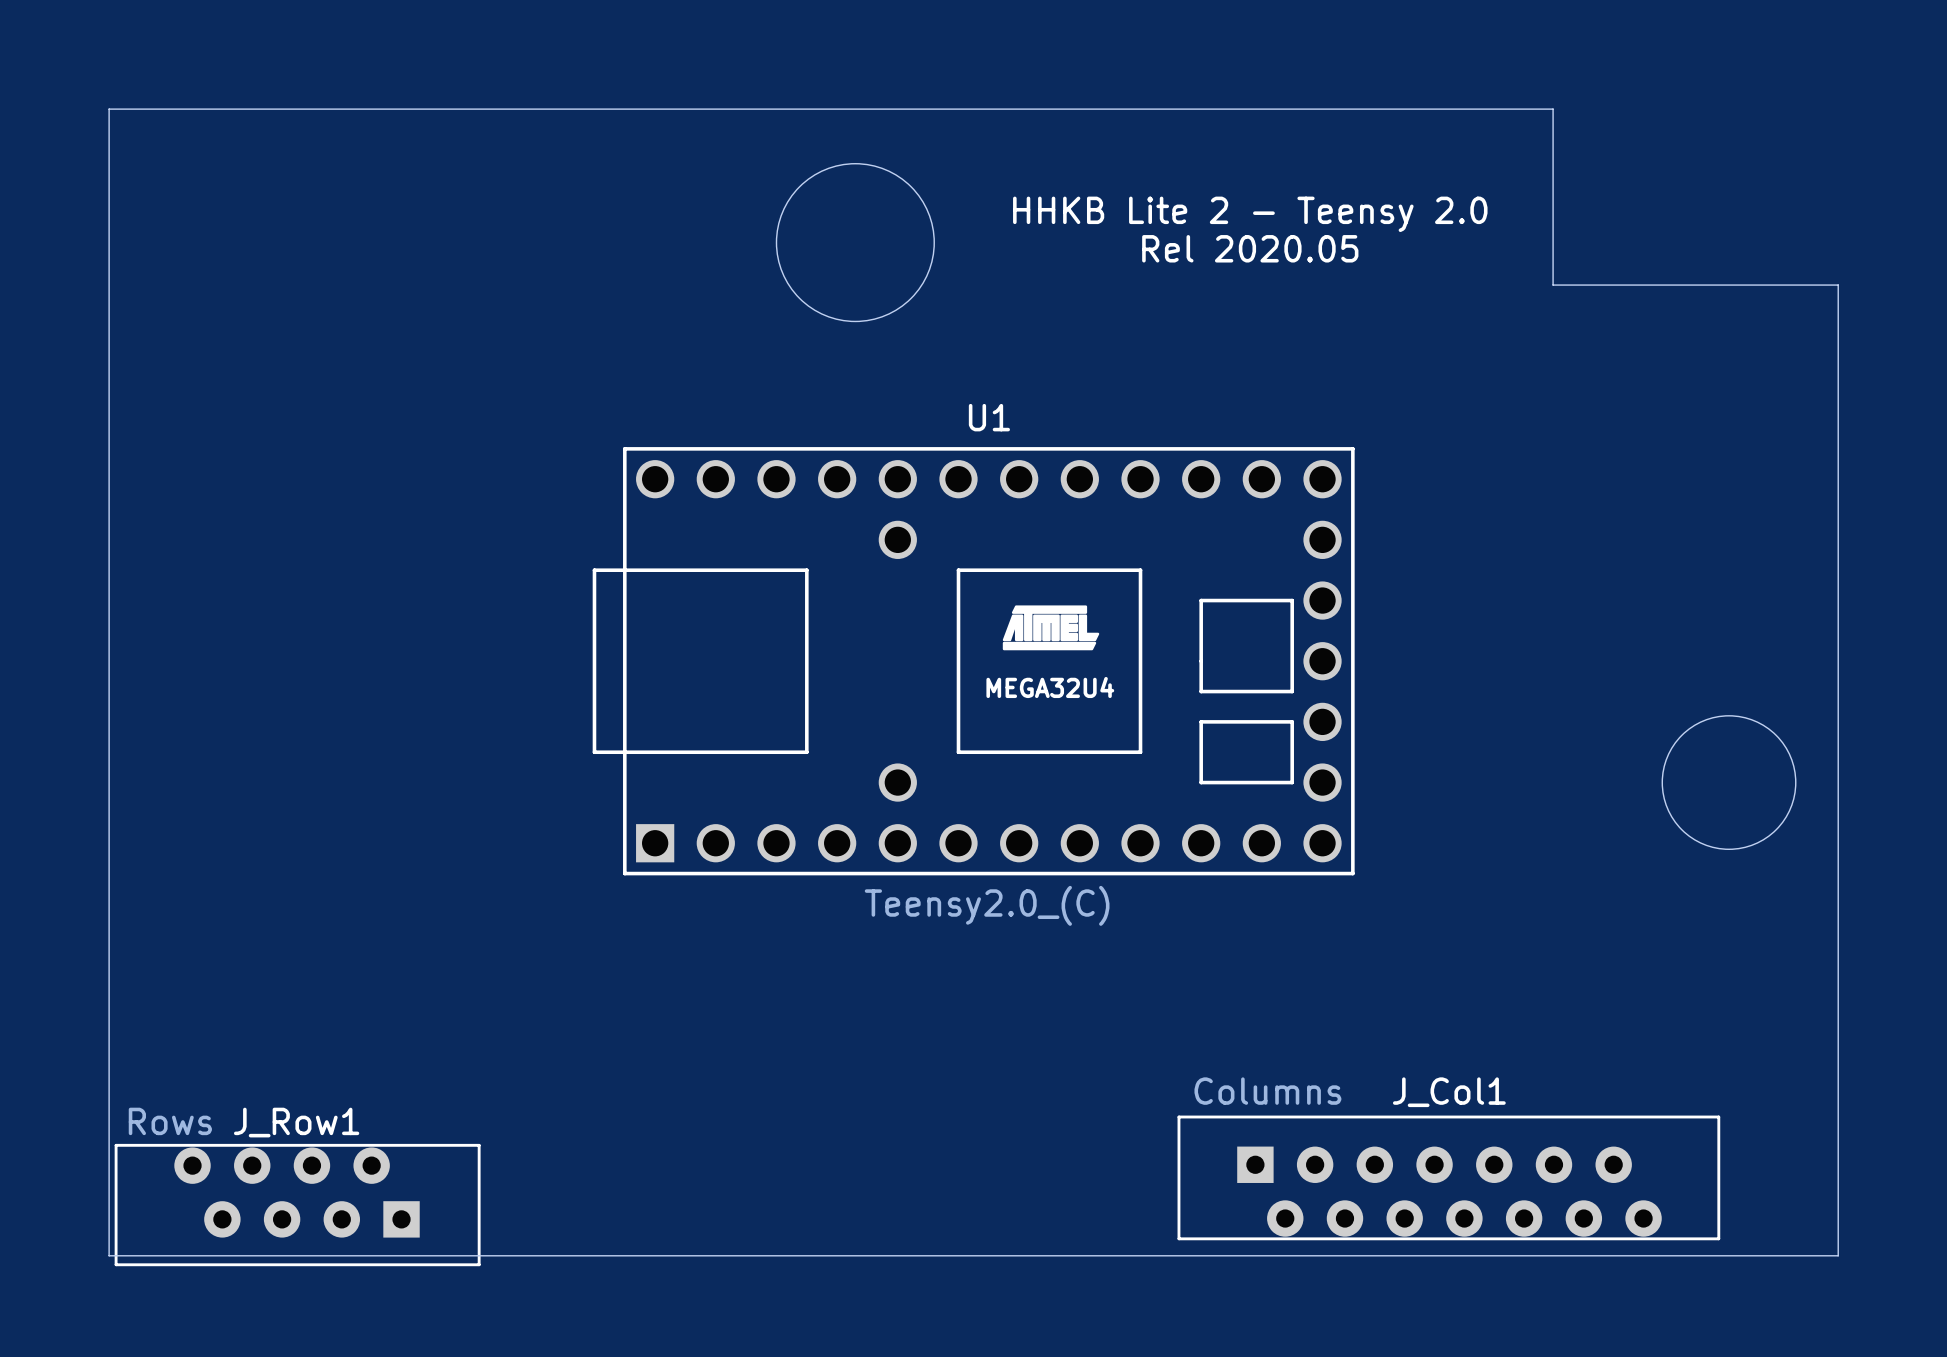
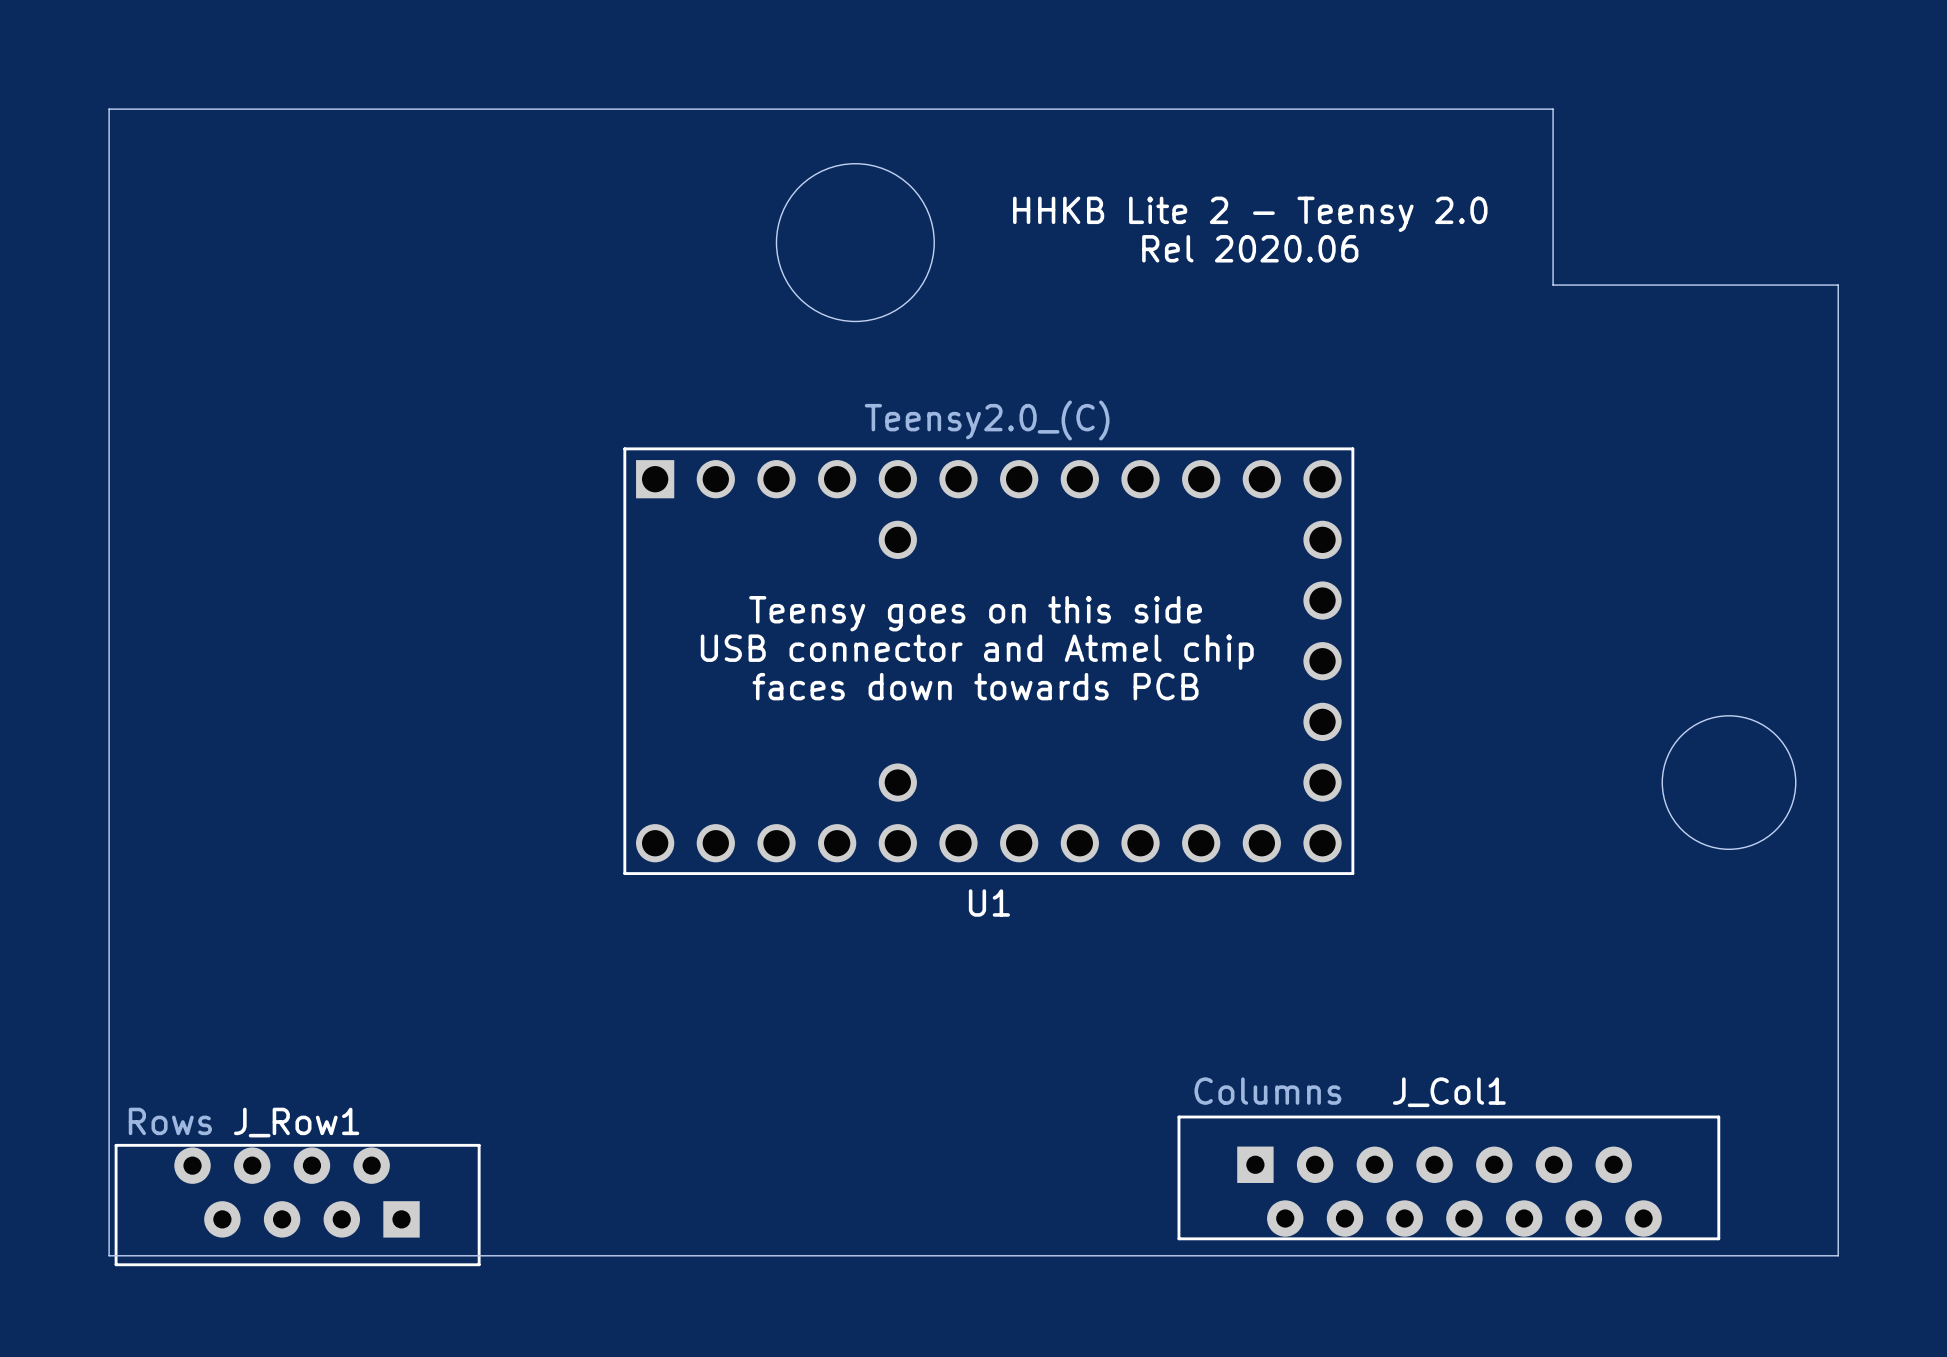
text: Rel 2020.05 (1250, 248) -> Rel 2020.06 (1250, 248)
line: none -> (624, 448) (624, 873) (1352, 873) (1352, 448) (624, 448)
text: none -> Teensy goes on this side (975, 613)
text: none -> USB connector and Atmel chip (977, 652)
U1 side: top (973, 661) -> bottom (988, 661)
text: none -> faces down towards PCB (975, 686)

